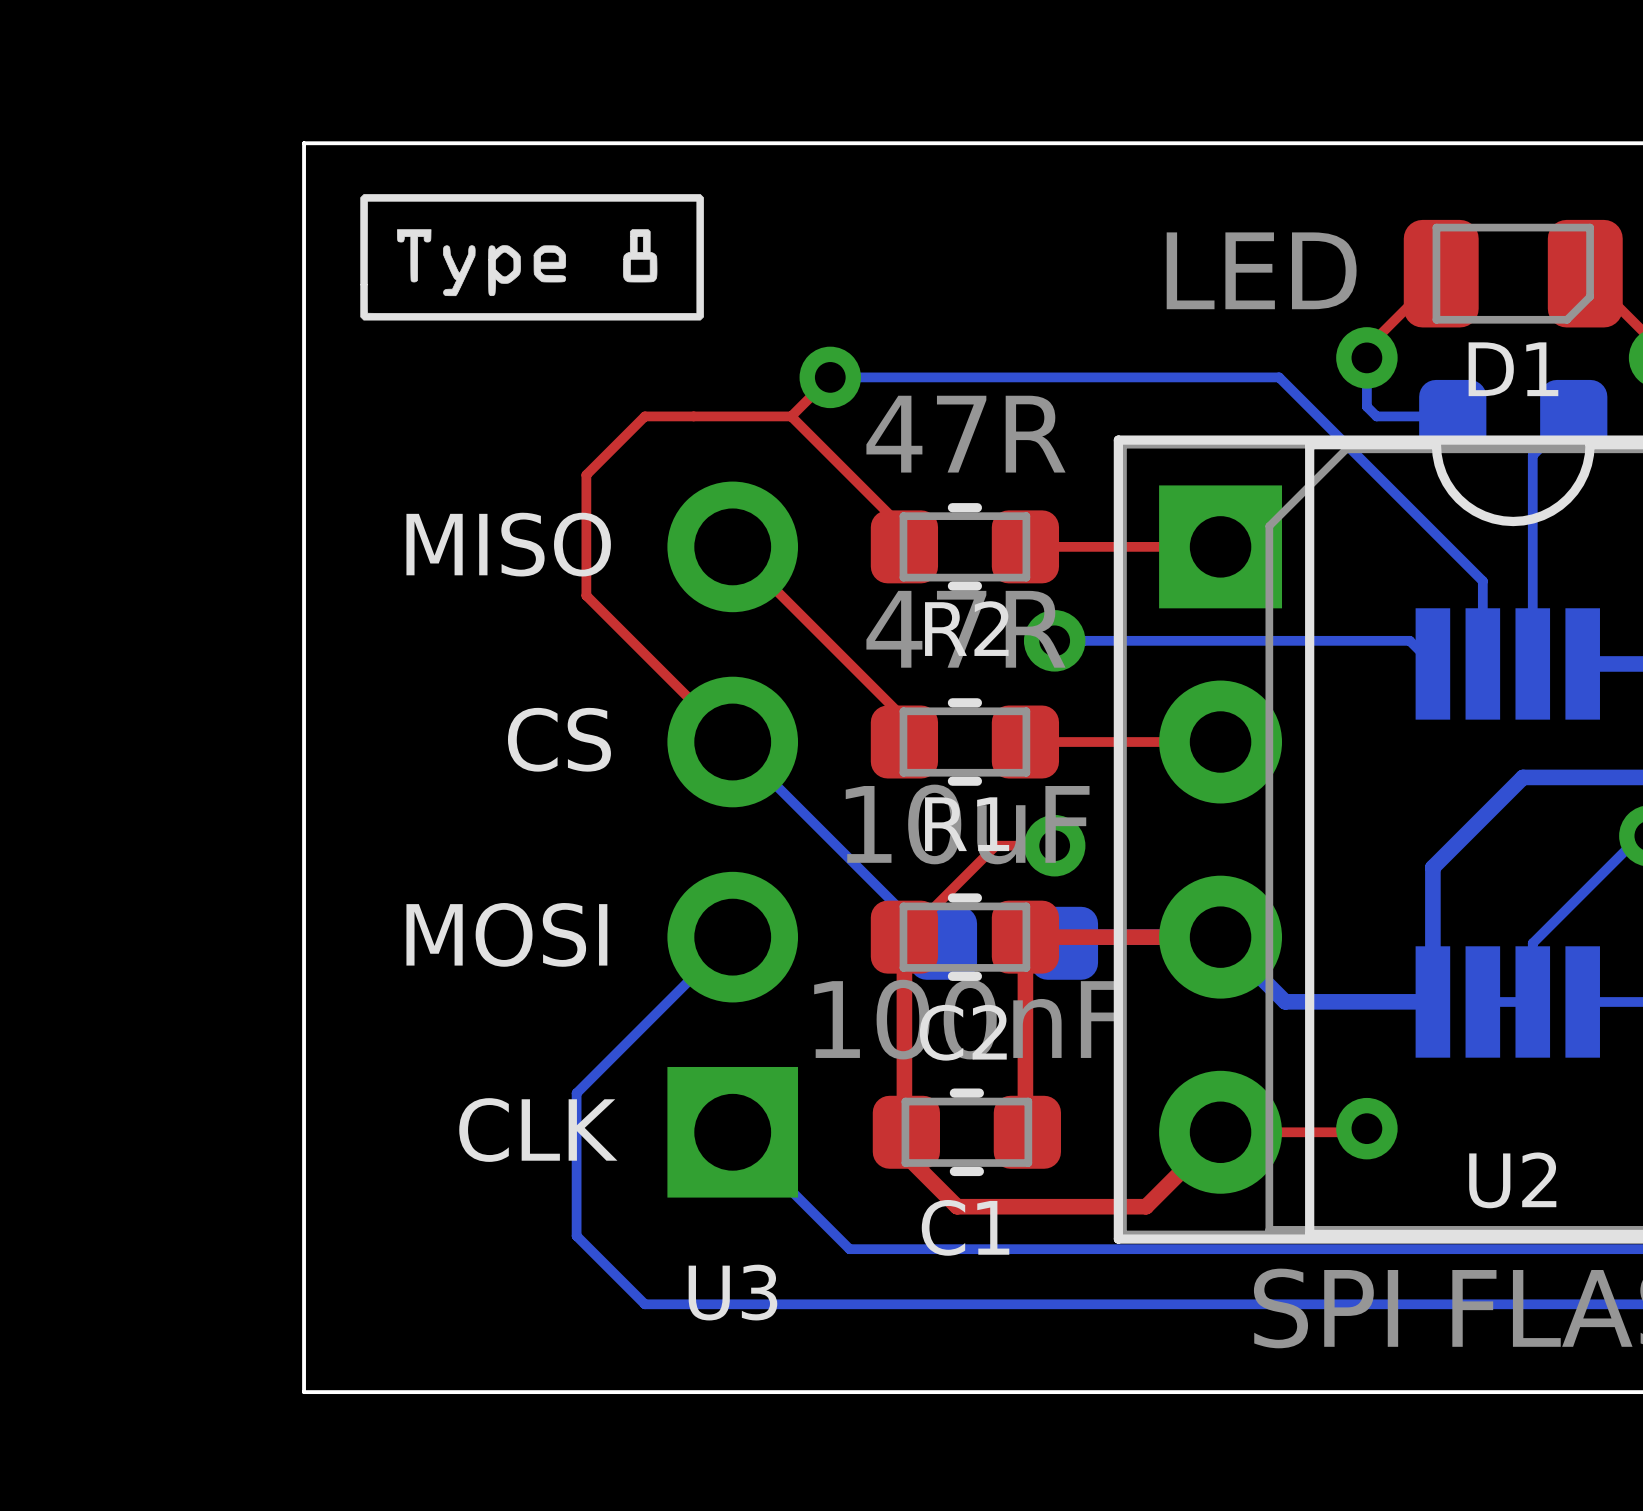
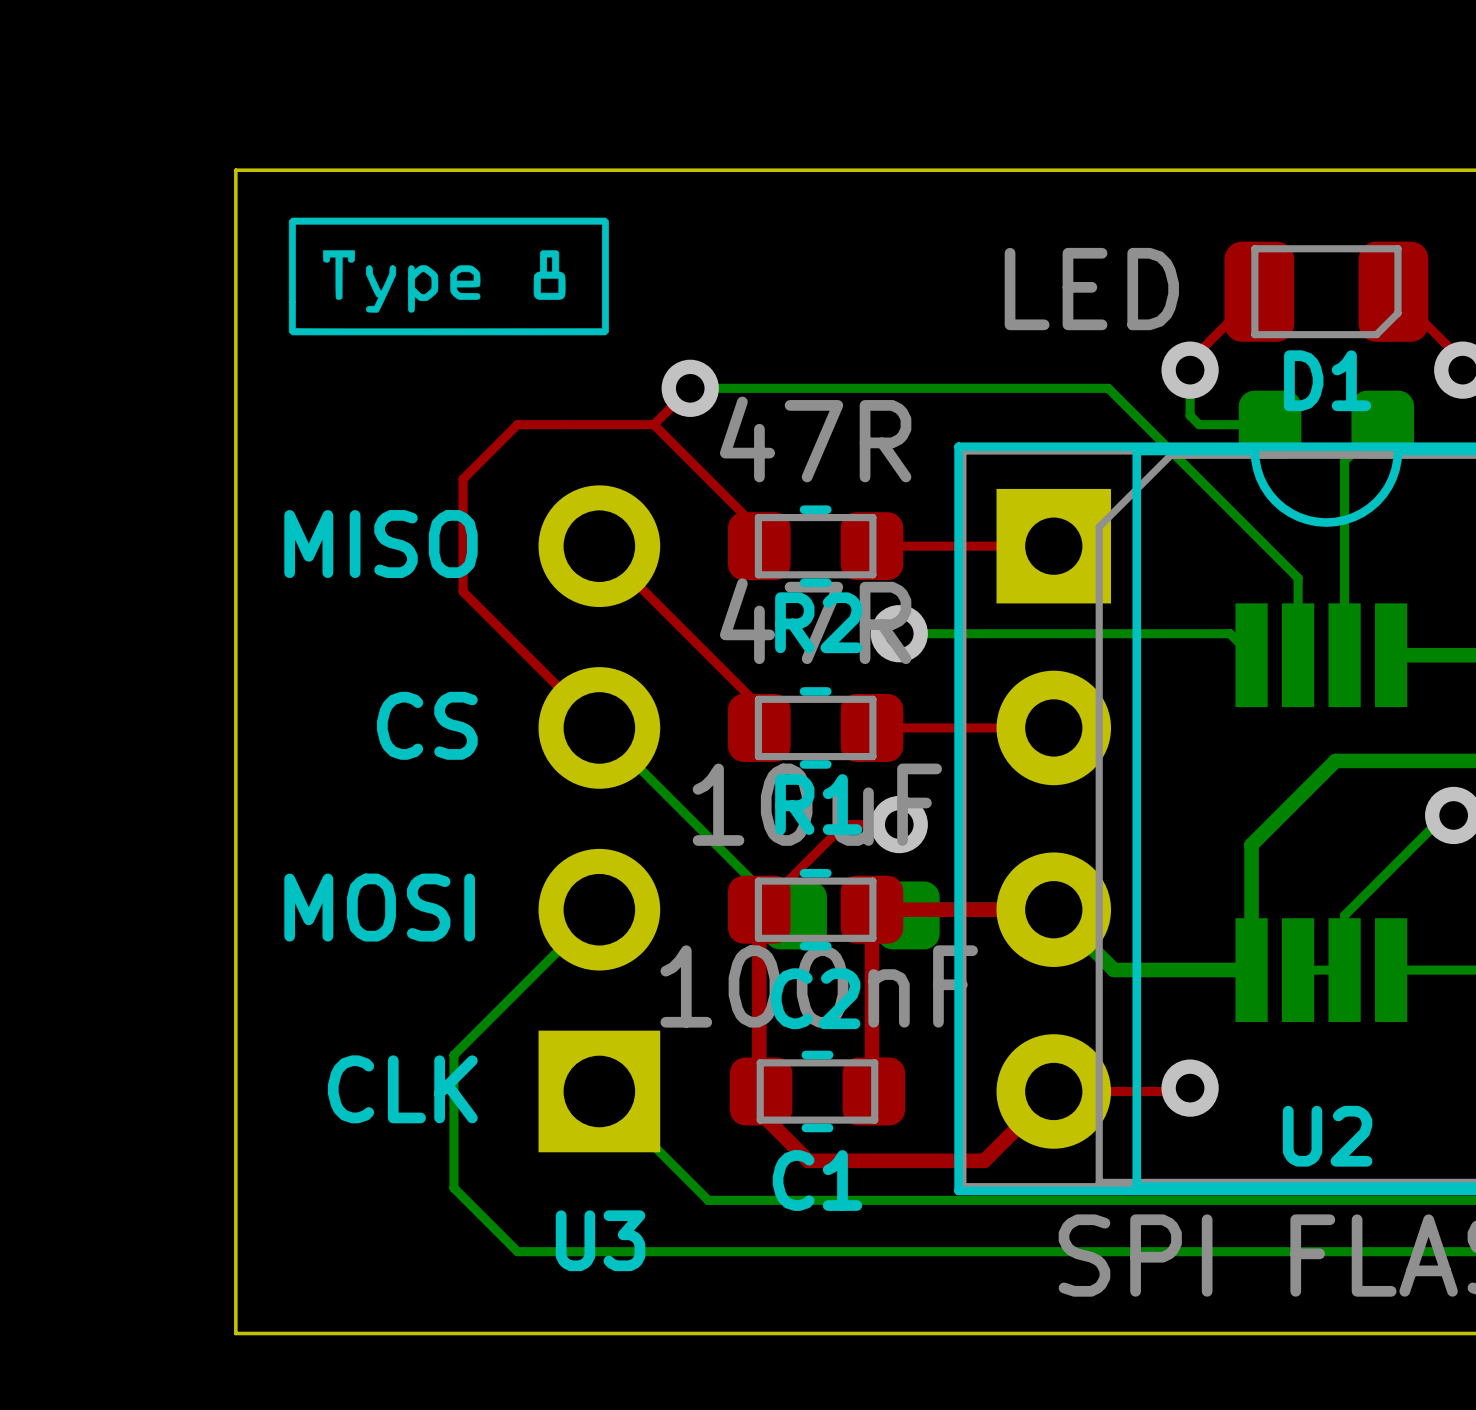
board edge: (342, 143) (304, 143) (304, 1392) (342, 1392) -> (235, 170) (235, 1333)
drawing position: (532, 257) -> (448, 276)

